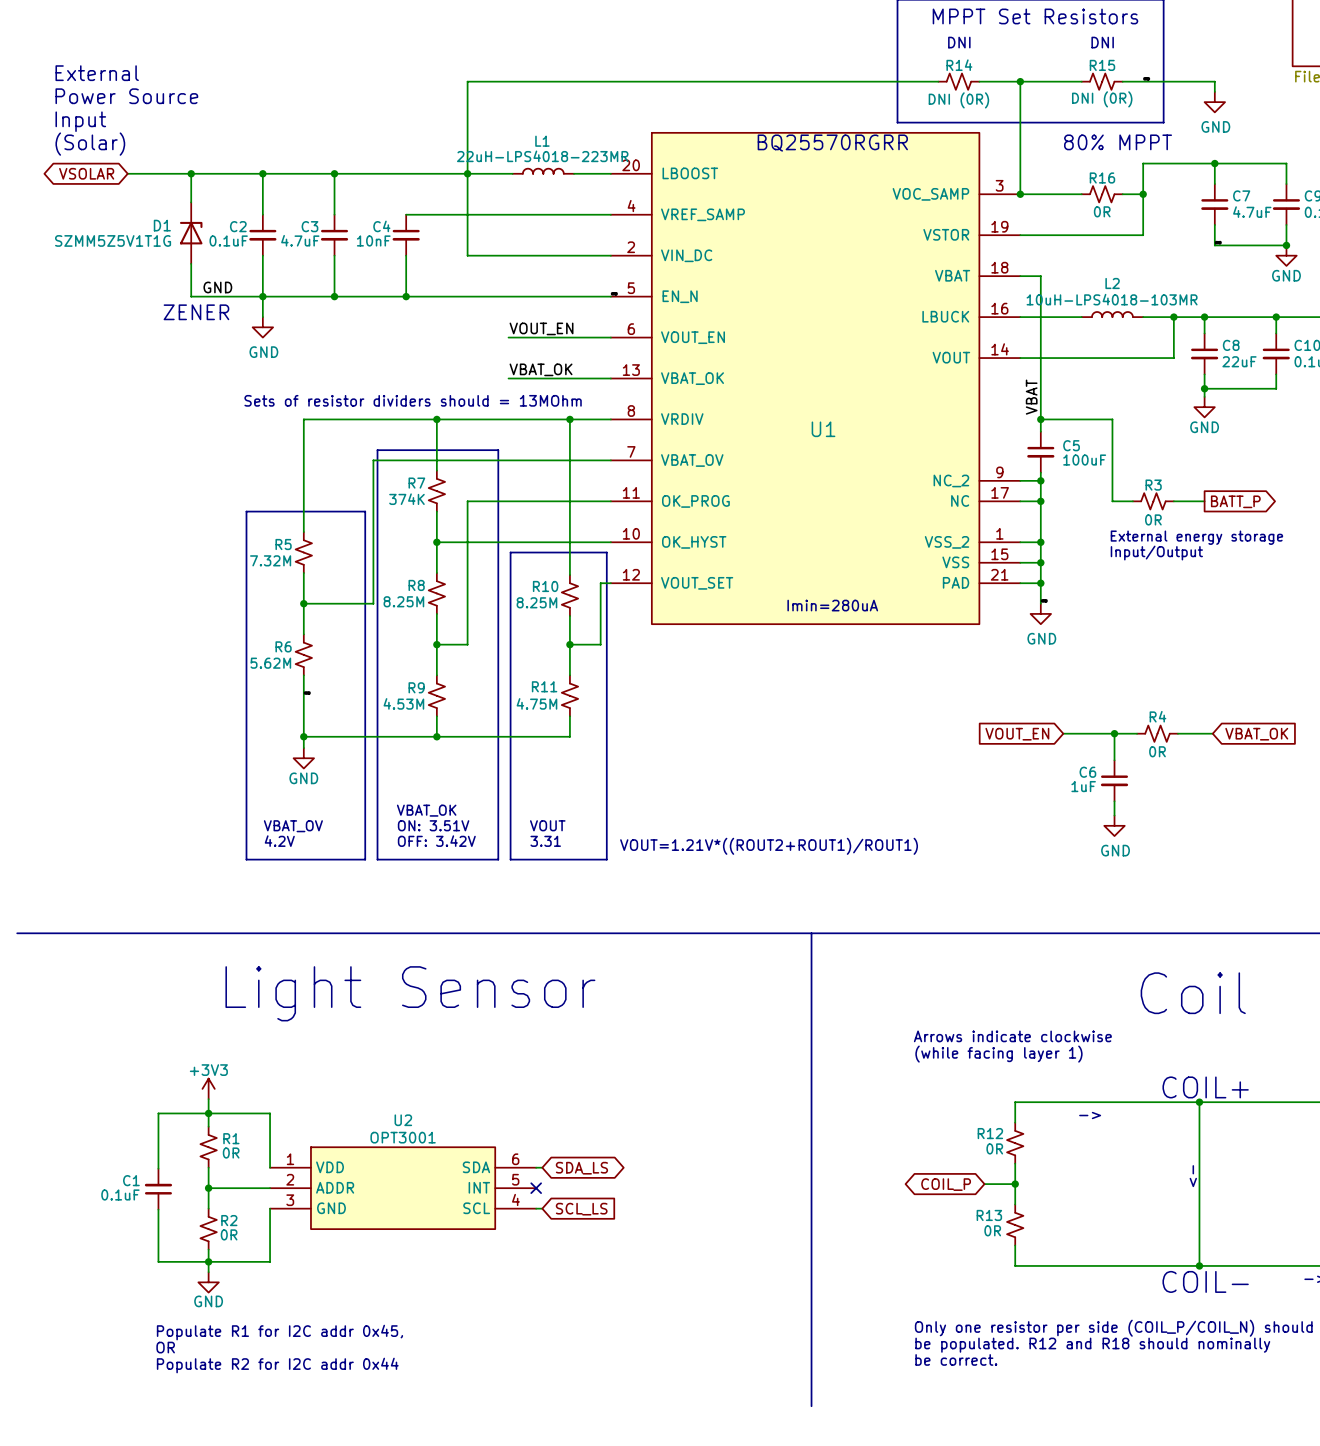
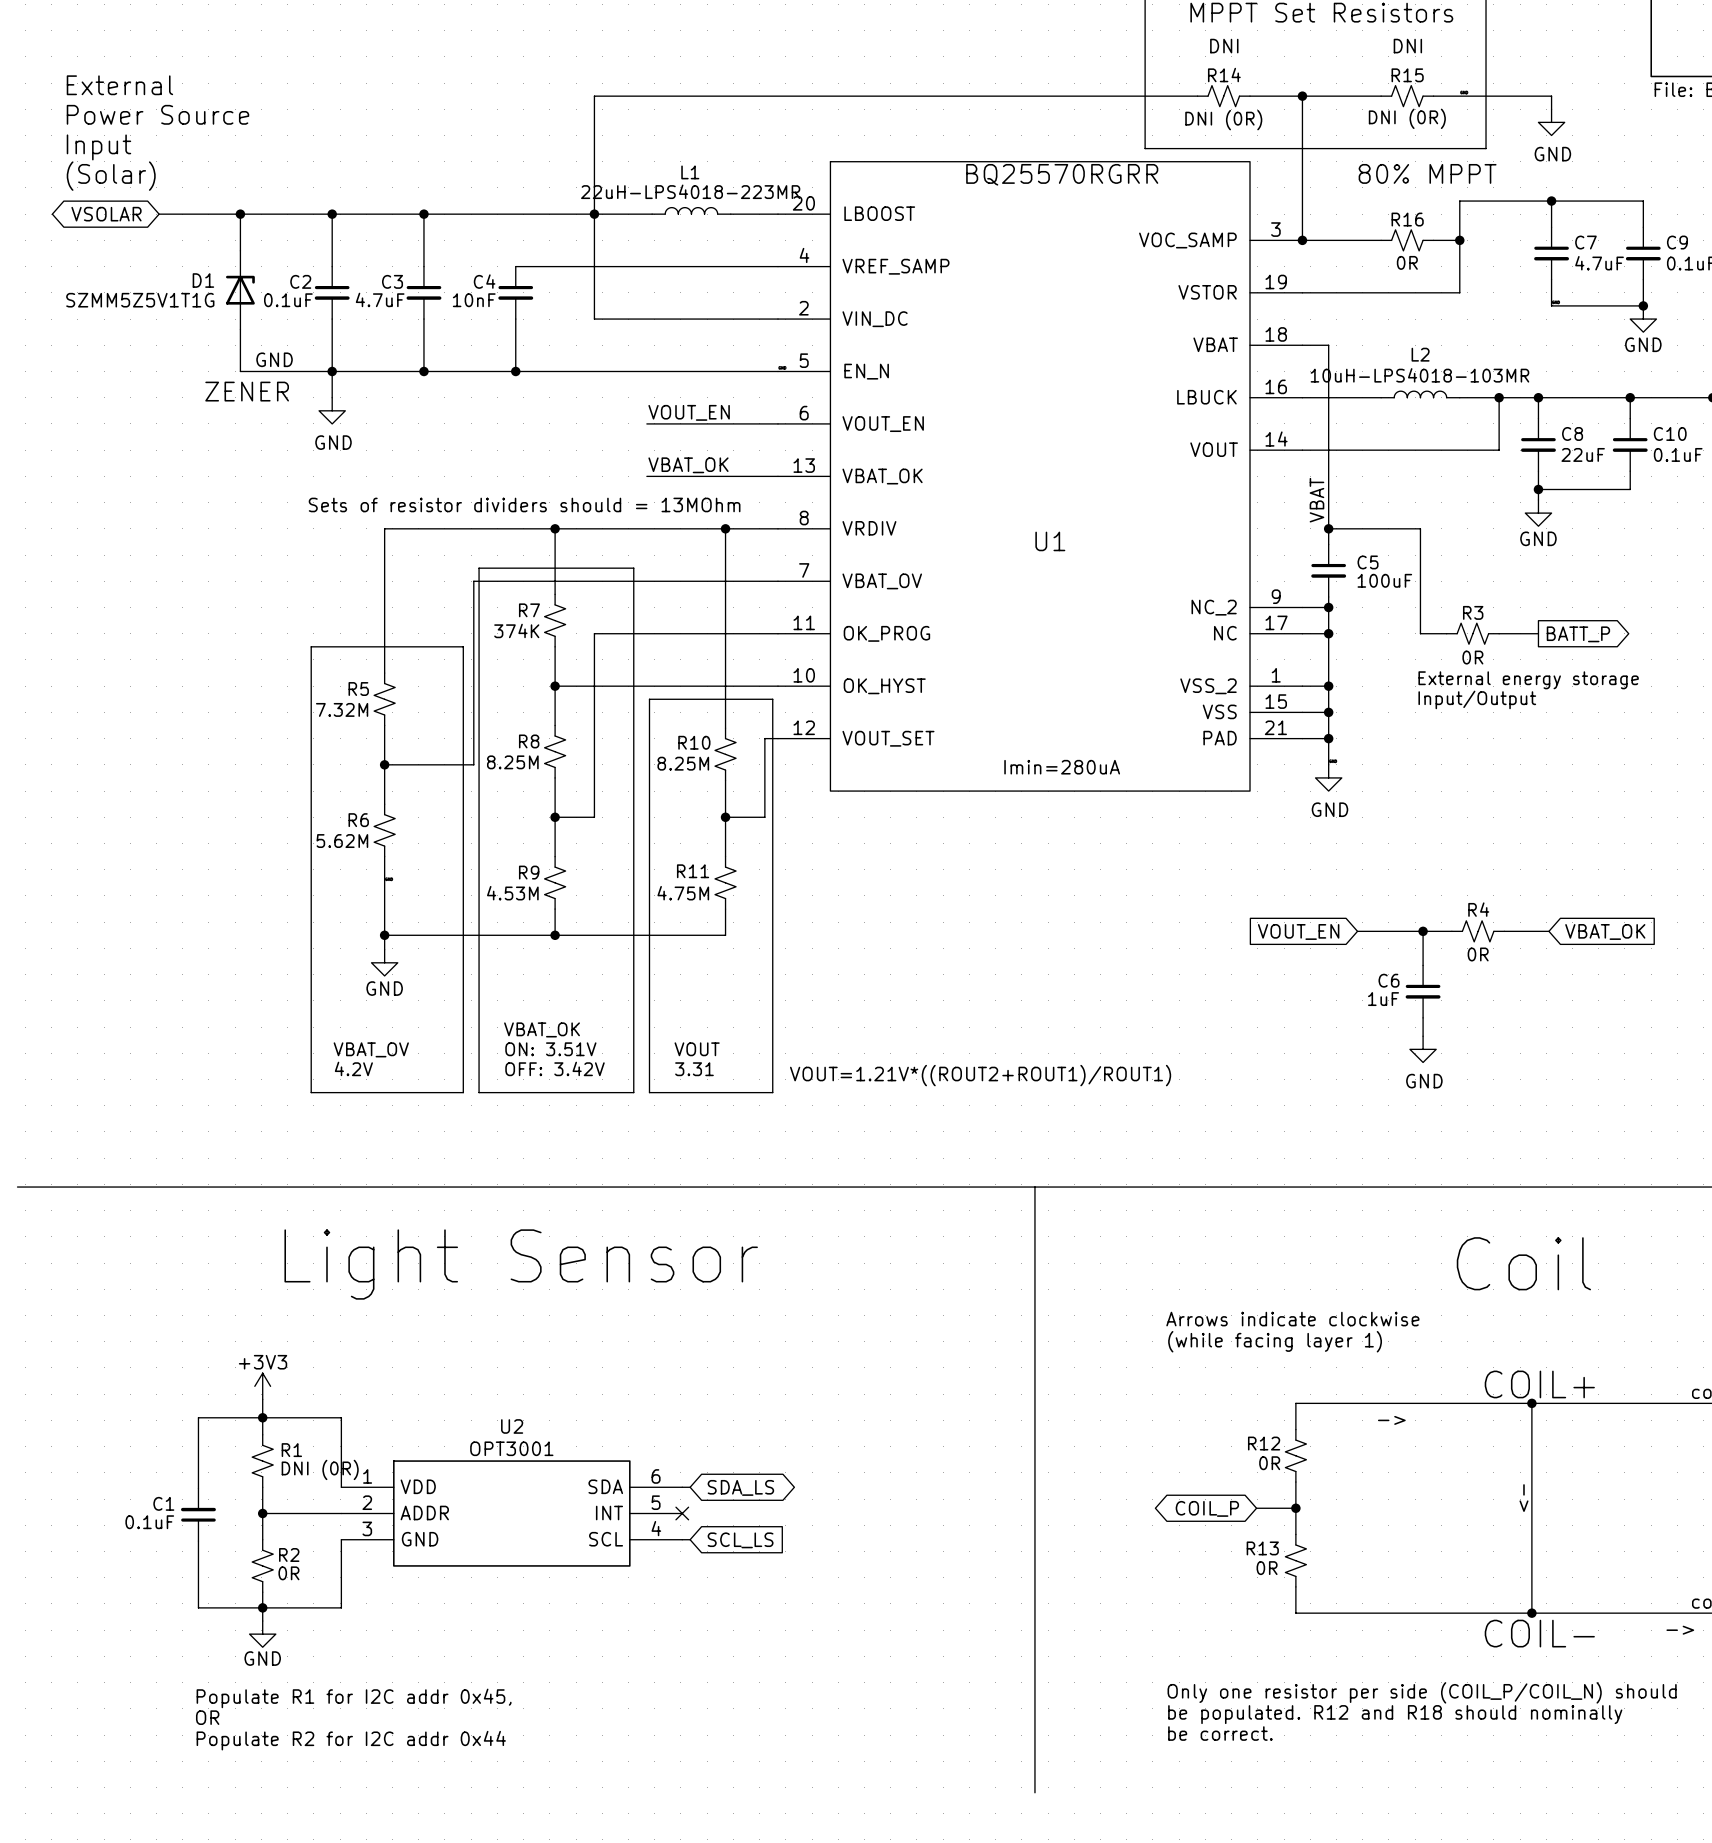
R1 value: 0R (231, 1153) -> DNI (0R) (320, 1469)

